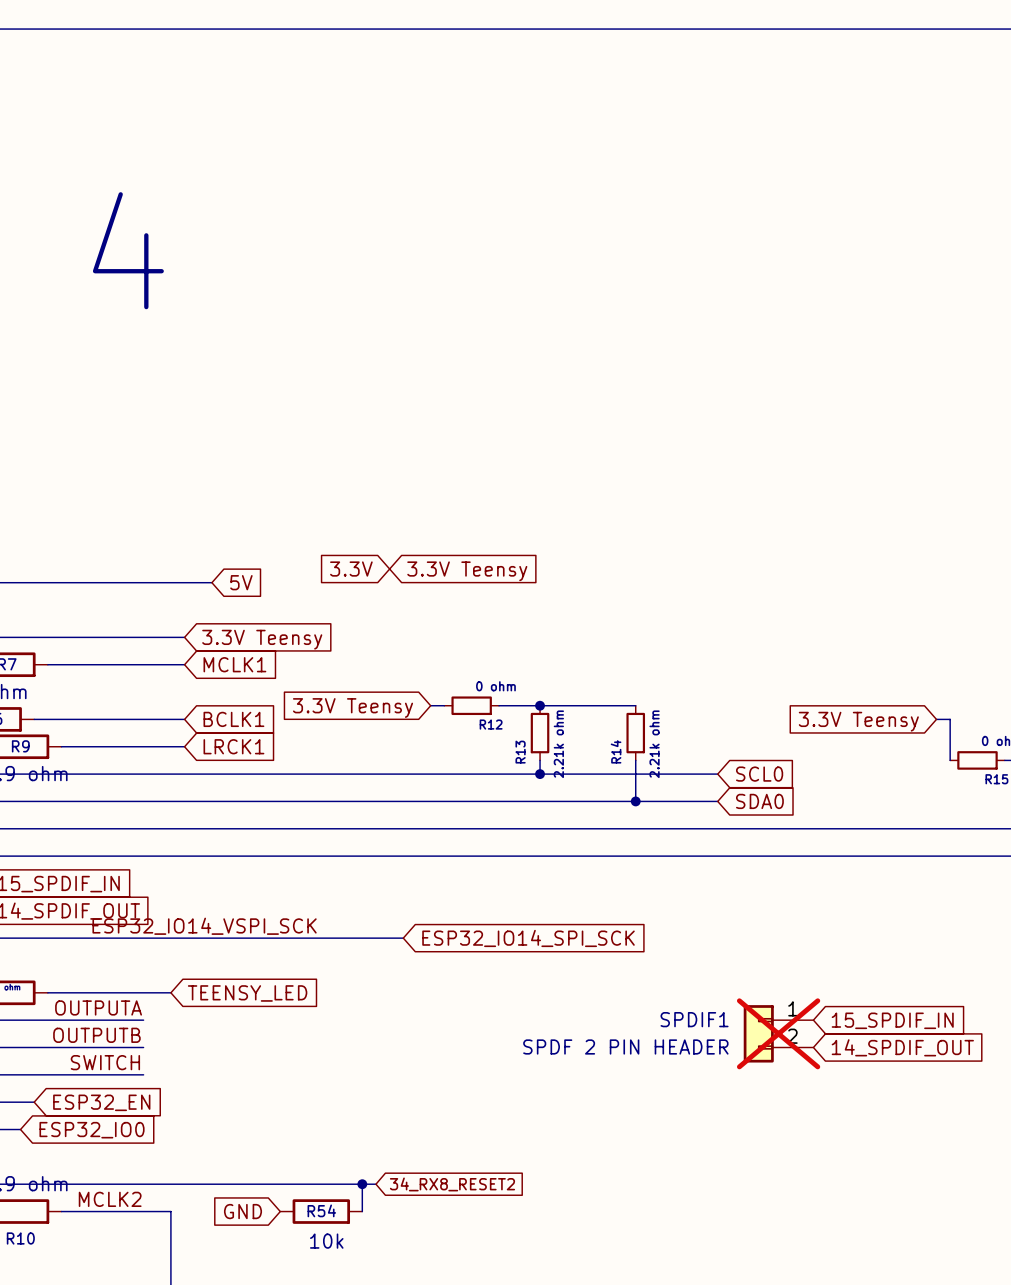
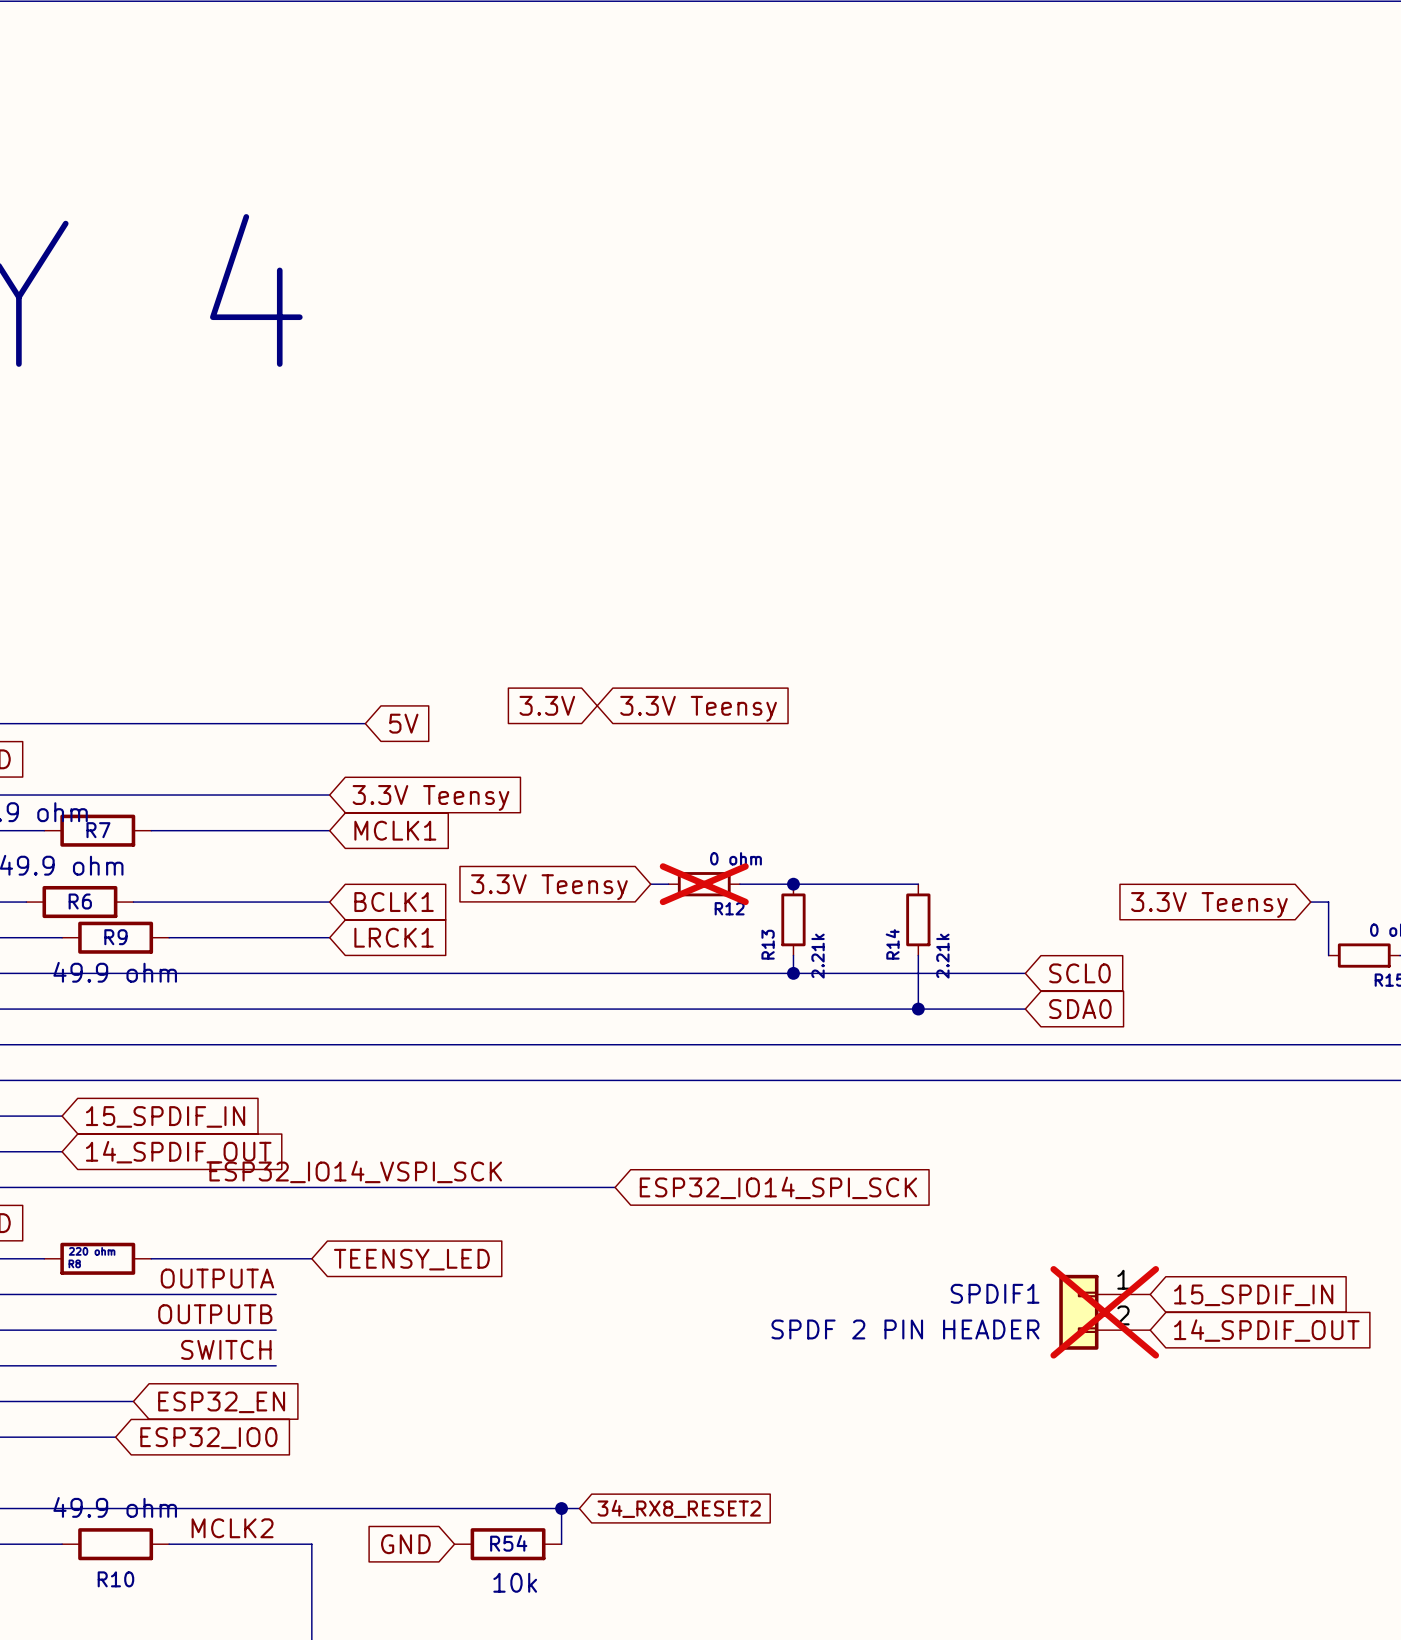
R12 do-not-place cross: none -> (704, 884)
R13 value: 2.21k ohm (558, 744) -> 2.21k (818, 956)
R14 value: 2.21k ohm (654, 744) -> 2.21k (942, 956)

